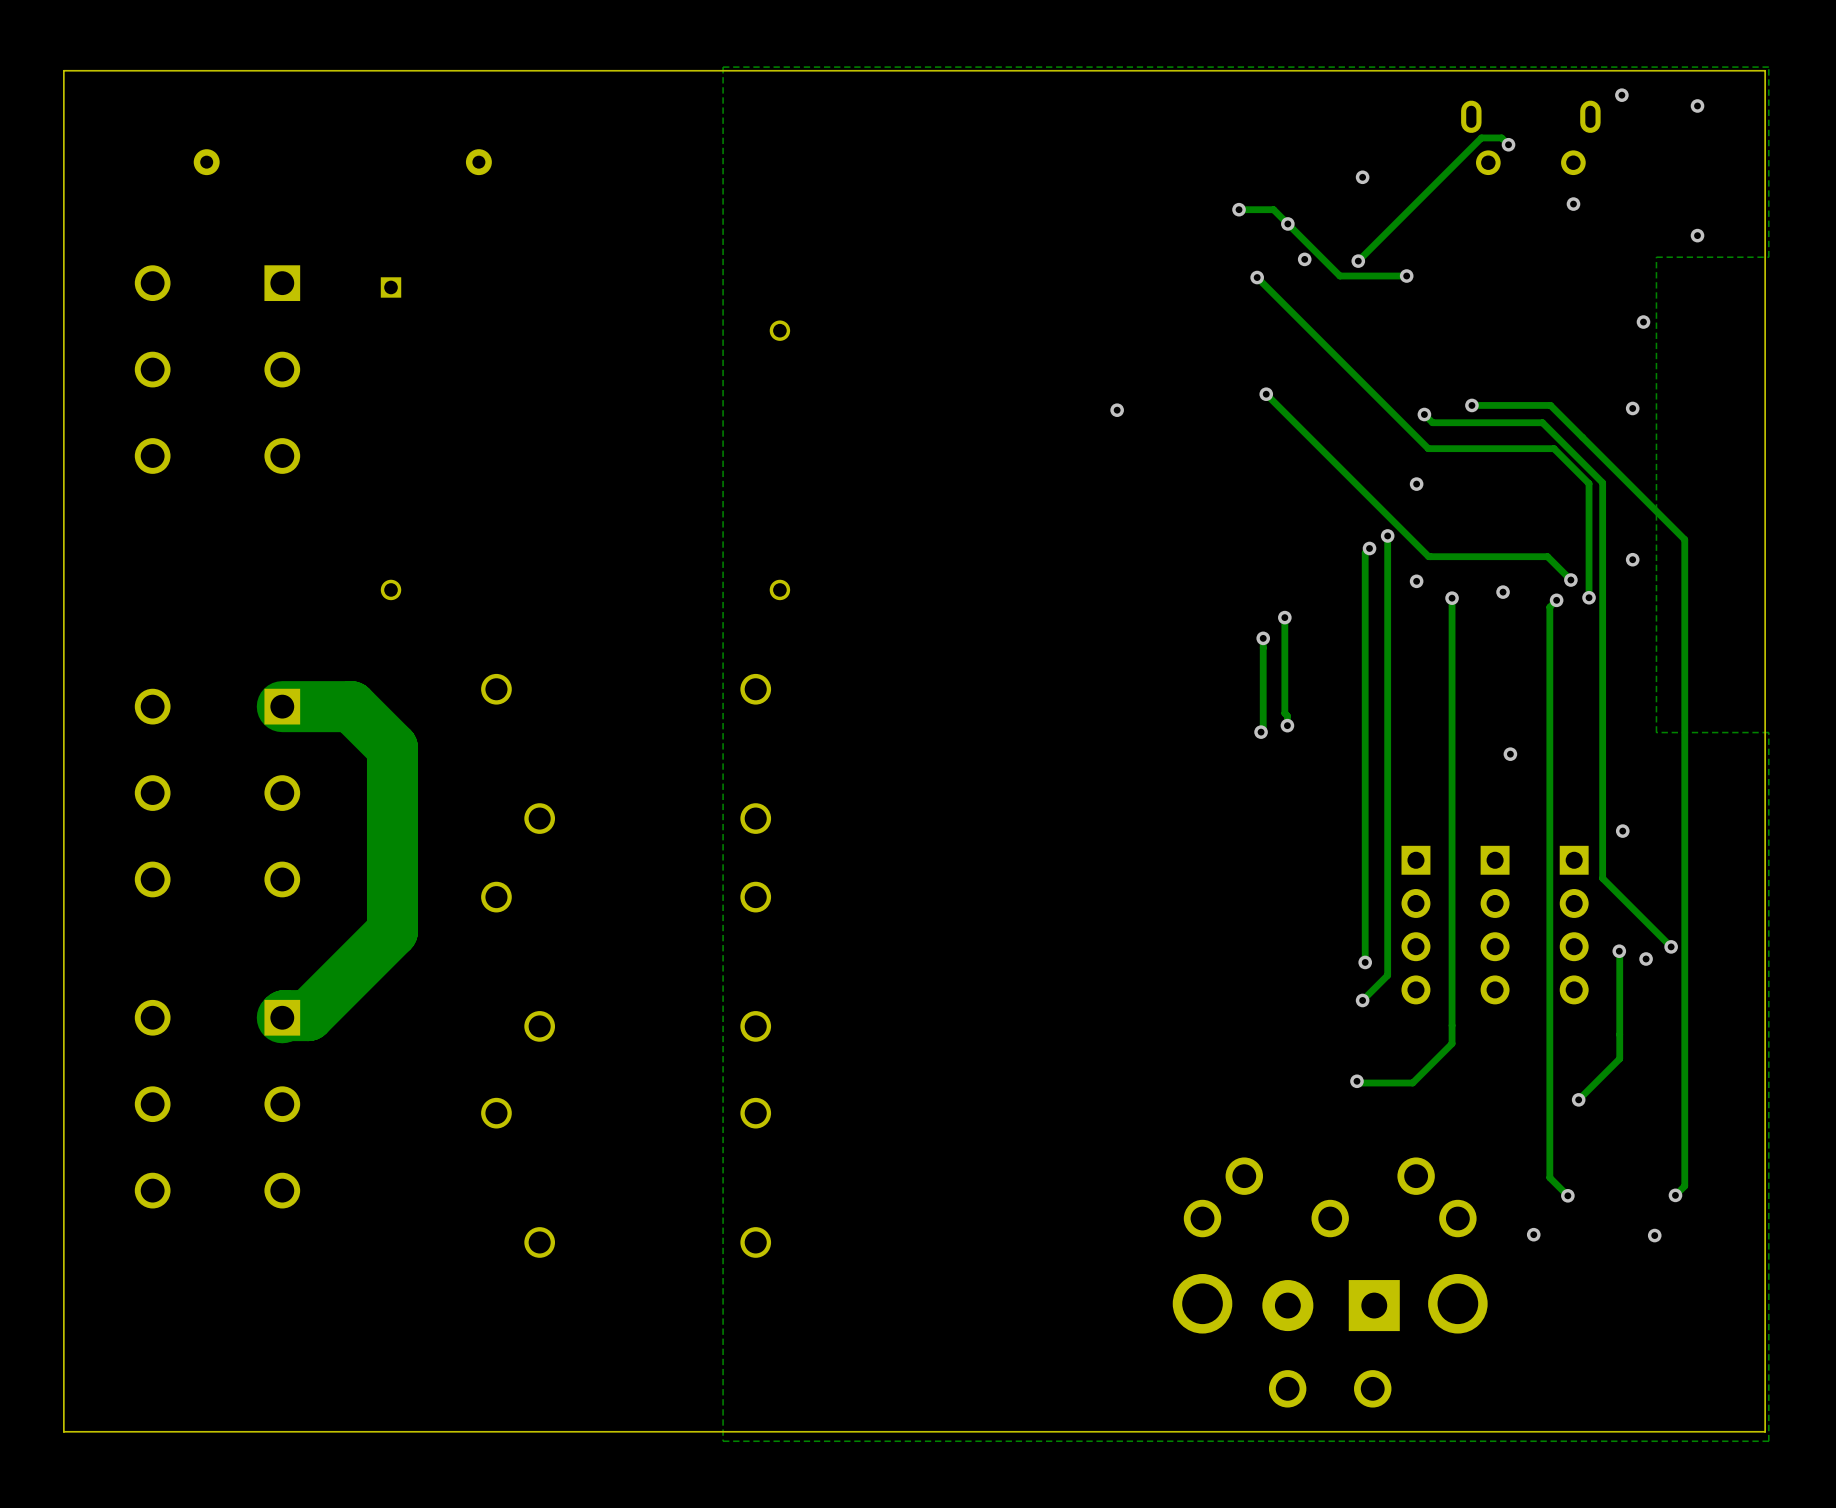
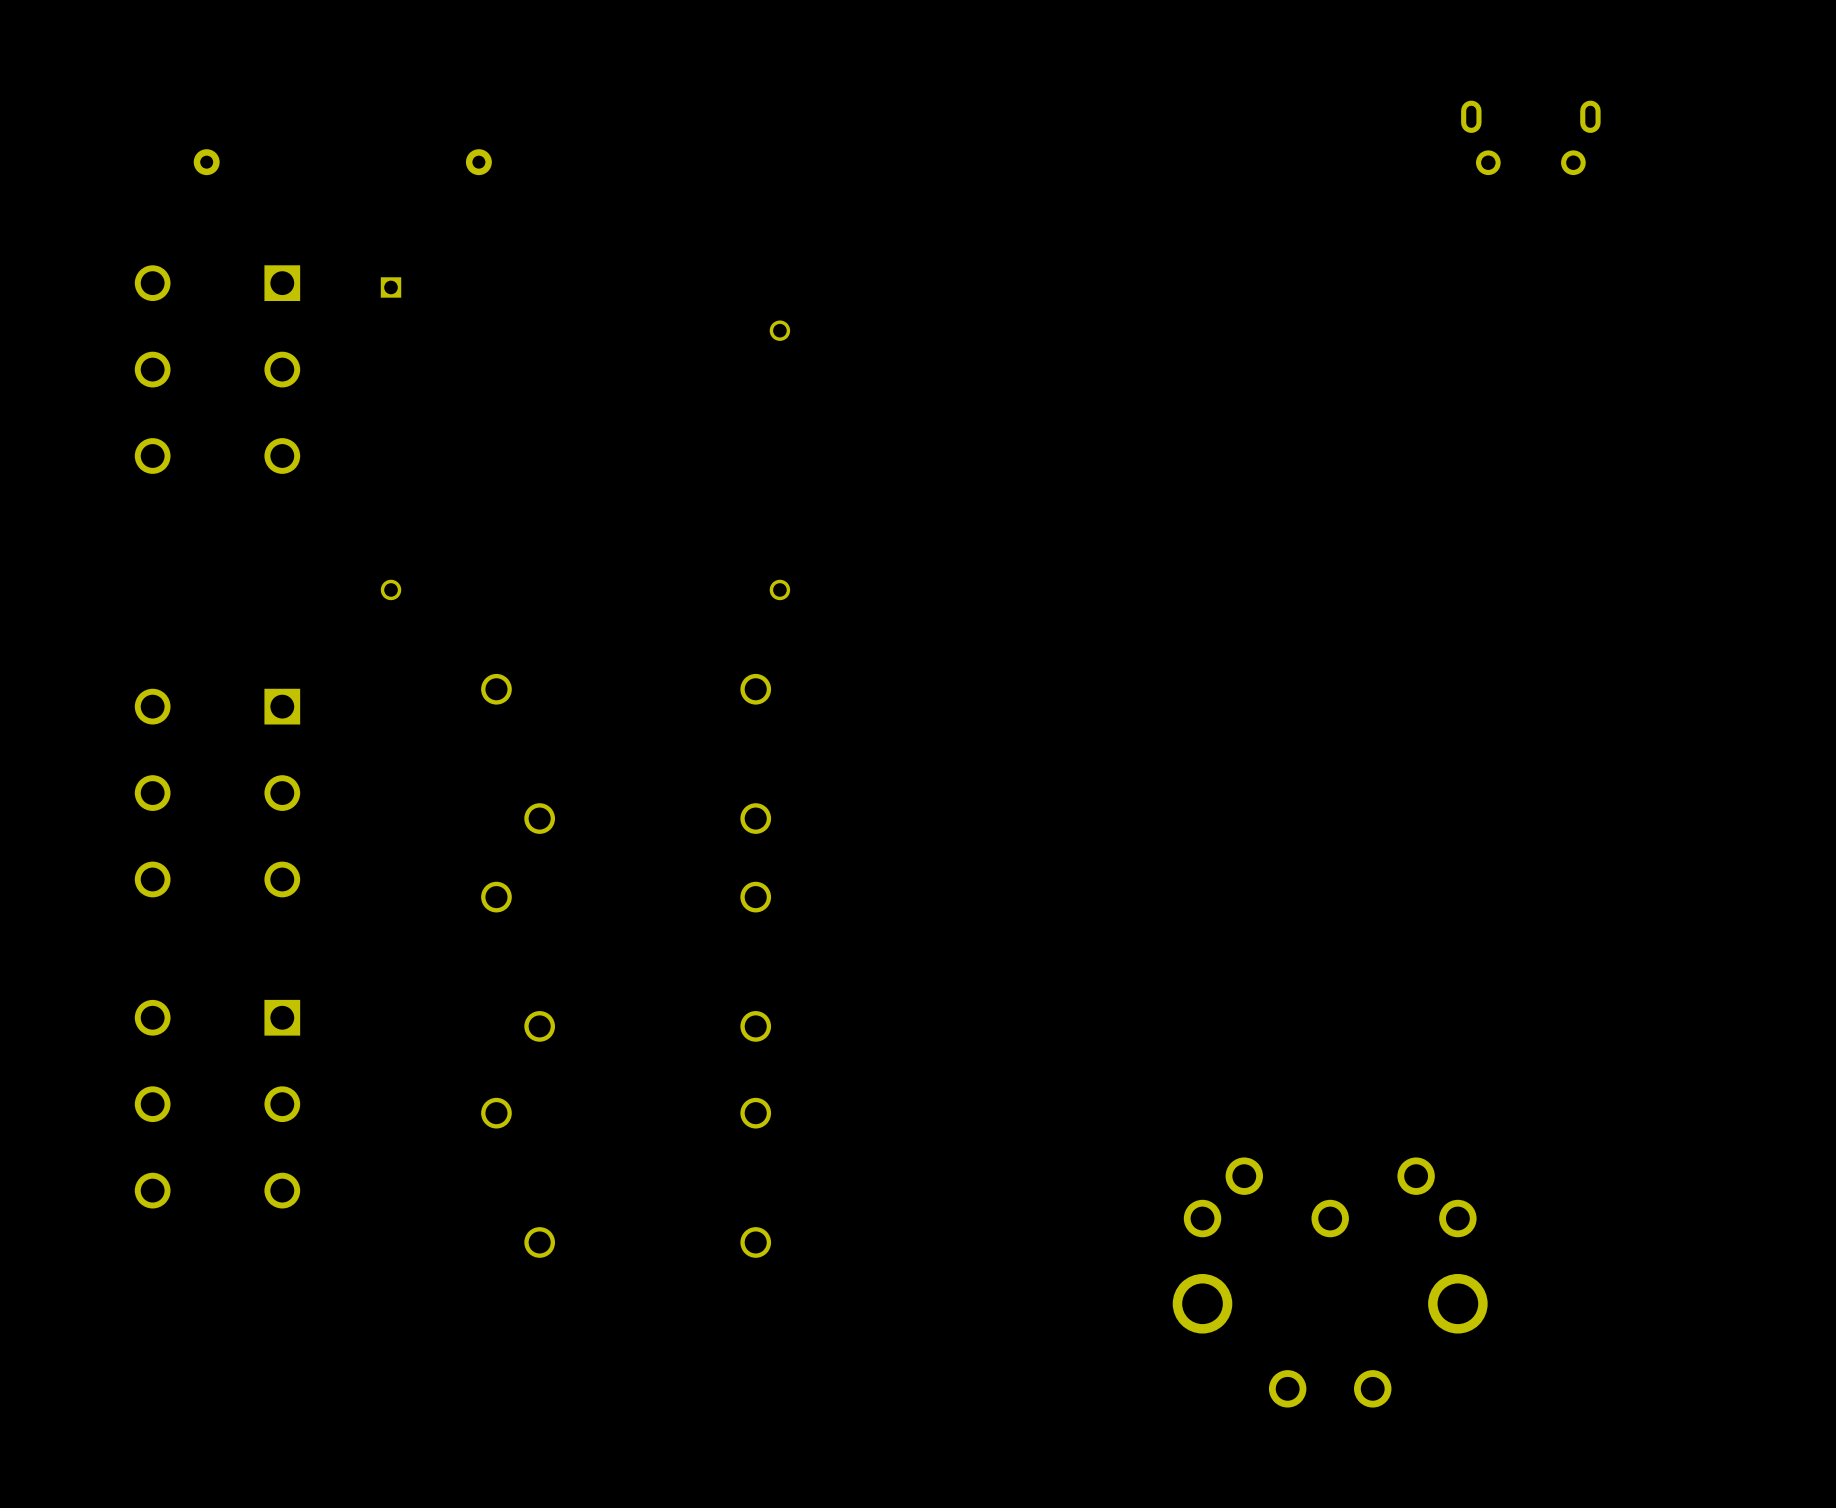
zone outline: (1768, 67) (1768, 257) (1656, 257) (1656, 732) (1768, 732) (1768, 1441) (723, 1441) (723, 67) (1768, 67) -> none
board edge: (1765, 70) (1765, 1431) (63, 1431) (63, 70) (1765, 70) -> none
via: (1621, 95) -> none
via: (1697, 105) -> none
track: (1508, 144) (1501, 137) (1481, 137) (1358, 261) -> none
via: (1508, 144) -> none
via: (1362, 177) -> none
via: (1573, 204) -> none
track: (1239, 209) (1273, 209) (1339, 276) (1406, 276) -> none
via: (1239, 209) -> none
via: (1287, 223) -> none
via: (1697, 235) -> none
via: (1304, 259) -> none
via: (1358, 261) -> none
via: (1406, 276) -> none
track: (1257, 277) (1428, 448) (1554, 448) (1589, 483) (1589, 597) -> none
via: (1257, 277) -> none
via: (1643, 322) -> none
track: (1266, 394) (1428, 556) (1547, 556) (1570, 580) -> none
via: (1266, 394) -> none
track: (1471, 405) (1550, 405) (1684, 539) (1684, 1186) (1675, 1195) -> none
via: (1471, 405) -> none
via: (1632, 408) -> none
via: (1117, 410) -> none
track: (1424, 414) (1432, 422) (1542, 422) (1602, 482) (1602, 878) (1671, 946) -> none
via: (1424, 414) -> none
via: (1416, 484) -> none
track: (1387, 535) (1387, 975) (1362, 1000) -> none
via: (1387, 535) -> none
track: (1369, 548) (1365, 552) (1365, 962) -> none
via: (1369, 548) -> none
via: (1632, 559) -> none
via: (1570, 580) -> none
via: (1416, 581) -> none
via: (1503, 592) -> none
via: (1589, 597) -> none
track: (1452, 598) (1452, 1043) (1412, 1083) (1358, 1083) (1356, 1081) -> none
via: (1452, 598) -> none
track: (1556, 600) (1549, 607) (1549, 1177) (1567, 1195) -> none
via: (1556, 600) -> none
track: (1284, 617) (1284, 713) (1287, 716) (1287, 725) -> none
via: (1284, 617) -> none
track: (1263, 638) (1263, 729) (1261, 732) -> none
via: (1263, 638) -> none
track: (282, 706) (351, 706) (392, 747) (392, 931) (308, 1015) (284, 1015) (282, 1017) -> none
via: (1287, 725) -> none
via: (1261, 732) -> none
via: (1510, 754) -> none
via: (1622, 831) -> none
part: (1415, 925) -> none
part: (1495, 925) -> none
part: (1574, 925) -> none
via: (1671, 946) -> none
track: (1619, 951) (1619, 1058) (1578, 1099) -> none
via: (1619, 951) -> none
via: (1646, 958) -> none
via: (1365, 962) -> none
via: (1362, 1000) -> none
via: (1356, 1081) -> none
via: (1578, 1099) -> none
via: (1567, 1195) -> none
via: (1675, 1195) -> none
via: (1533, 1234) -> none
via: (1654, 1235) -> none
part: (1331, 1305) -> none

